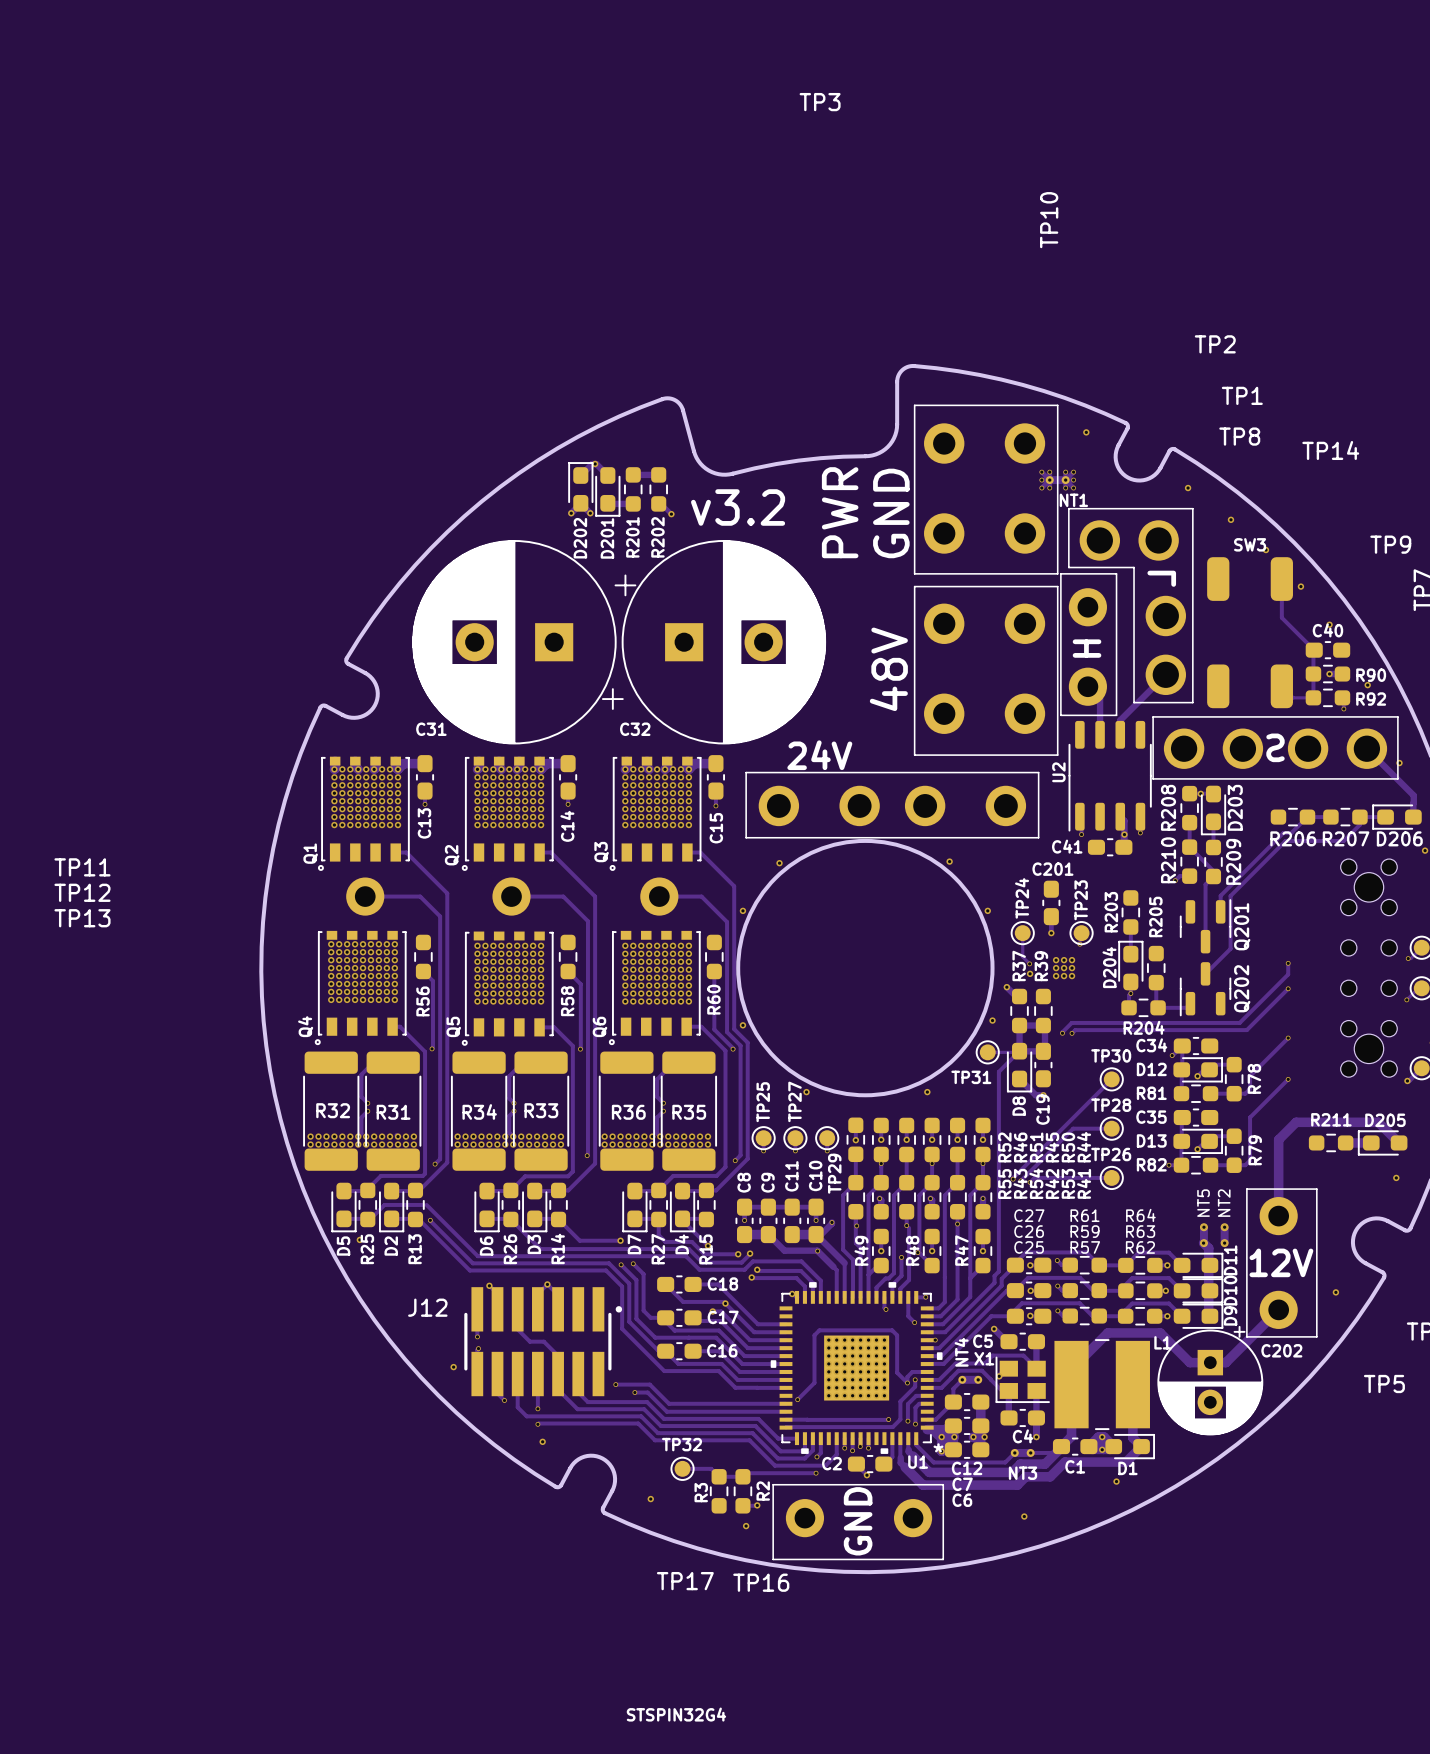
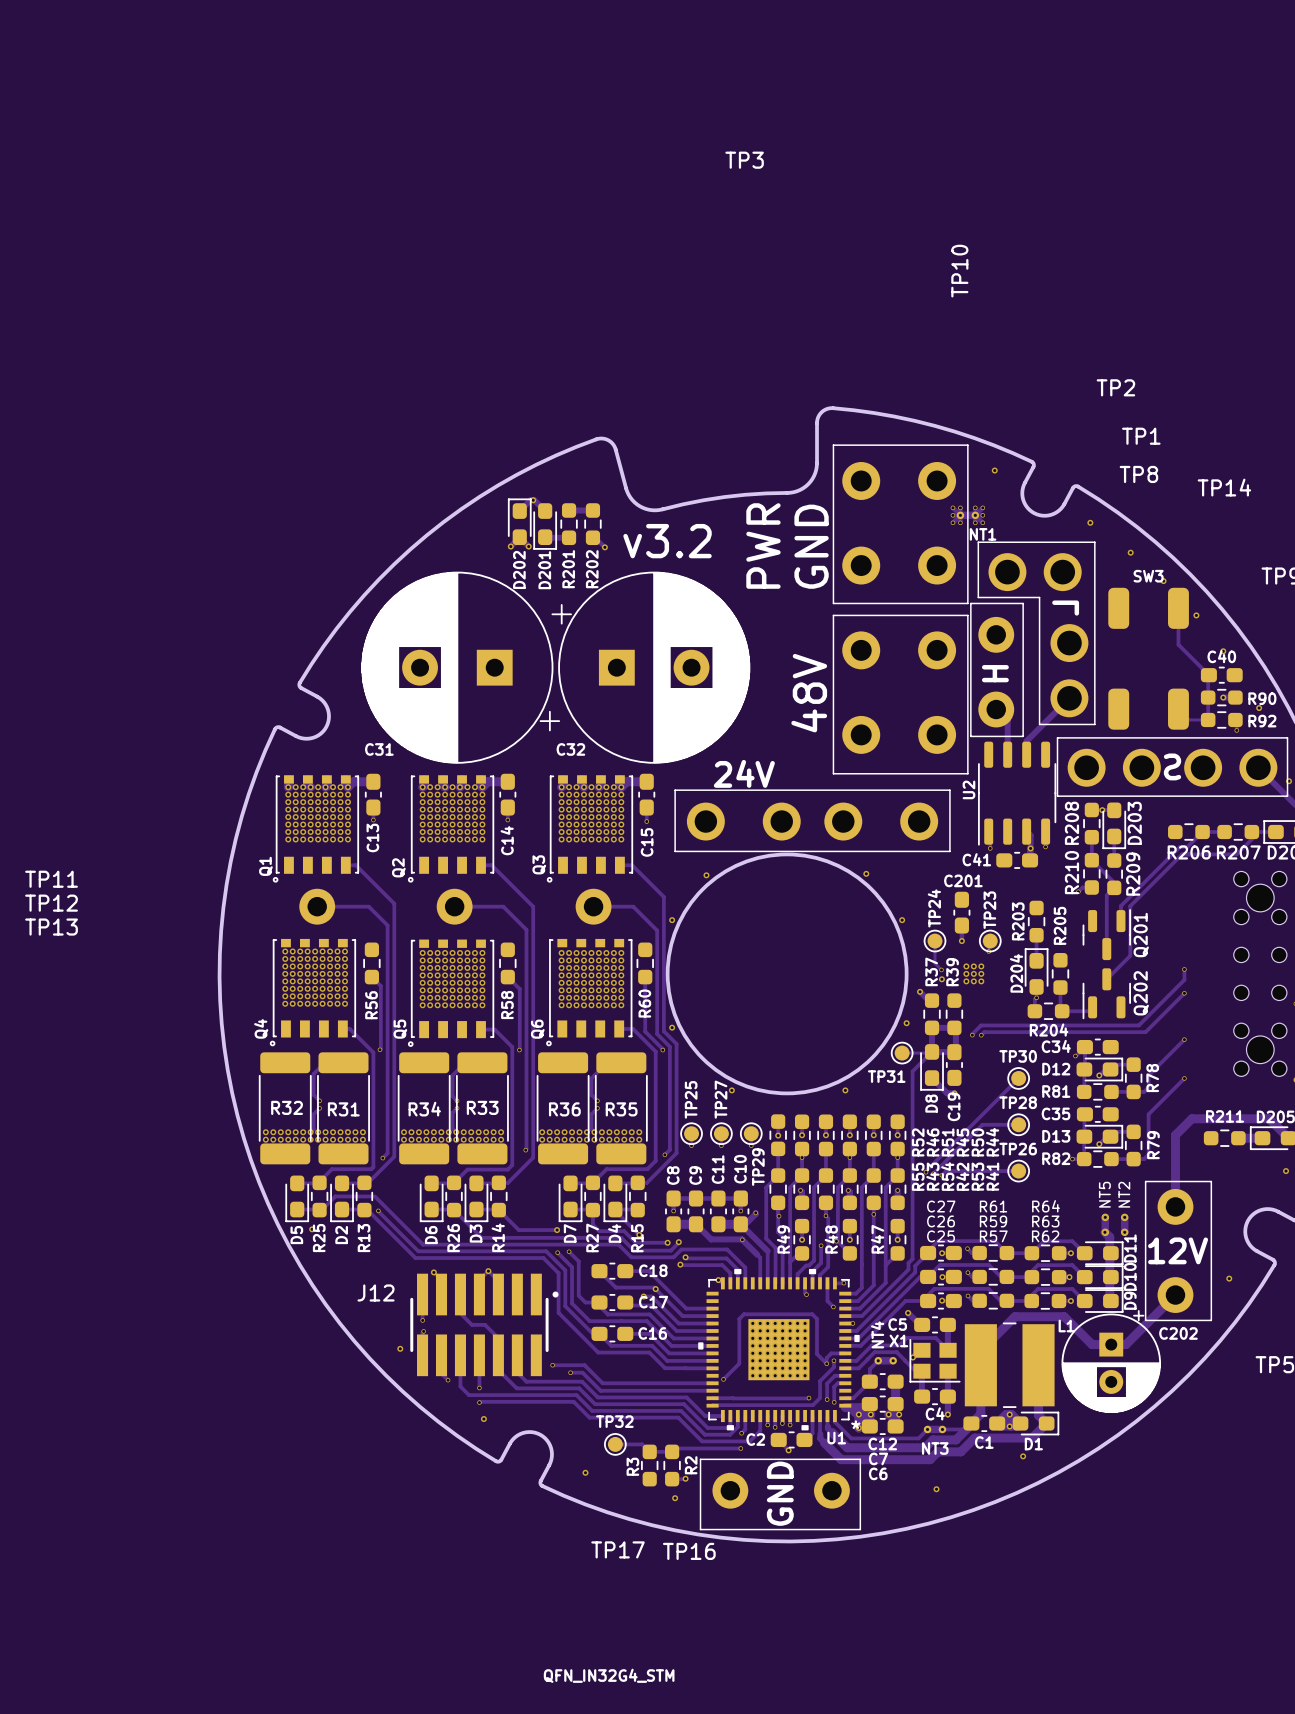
U1 value: STSPIN32G4 (676, 1714) -> QFN_IN32G4_STM (609, 1675)

